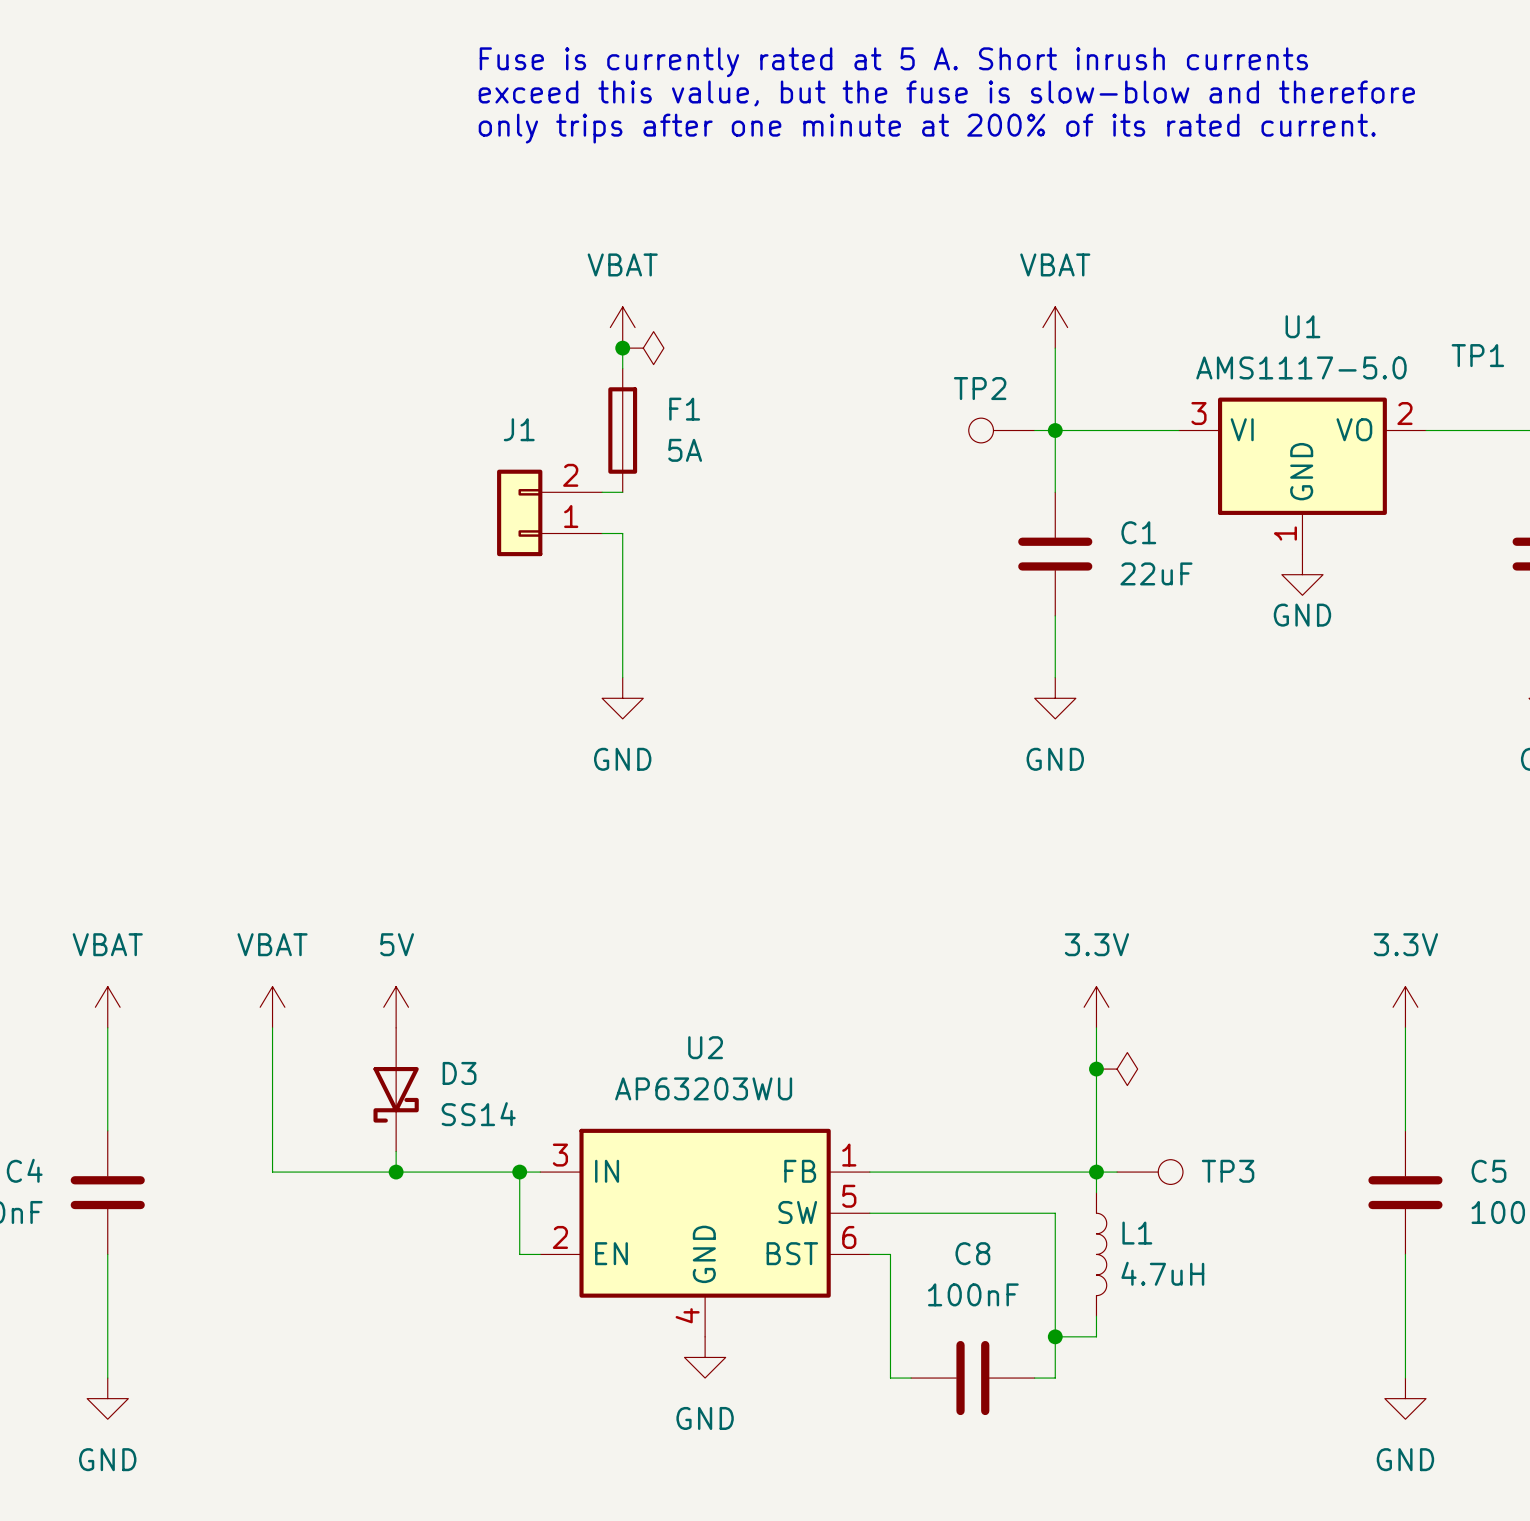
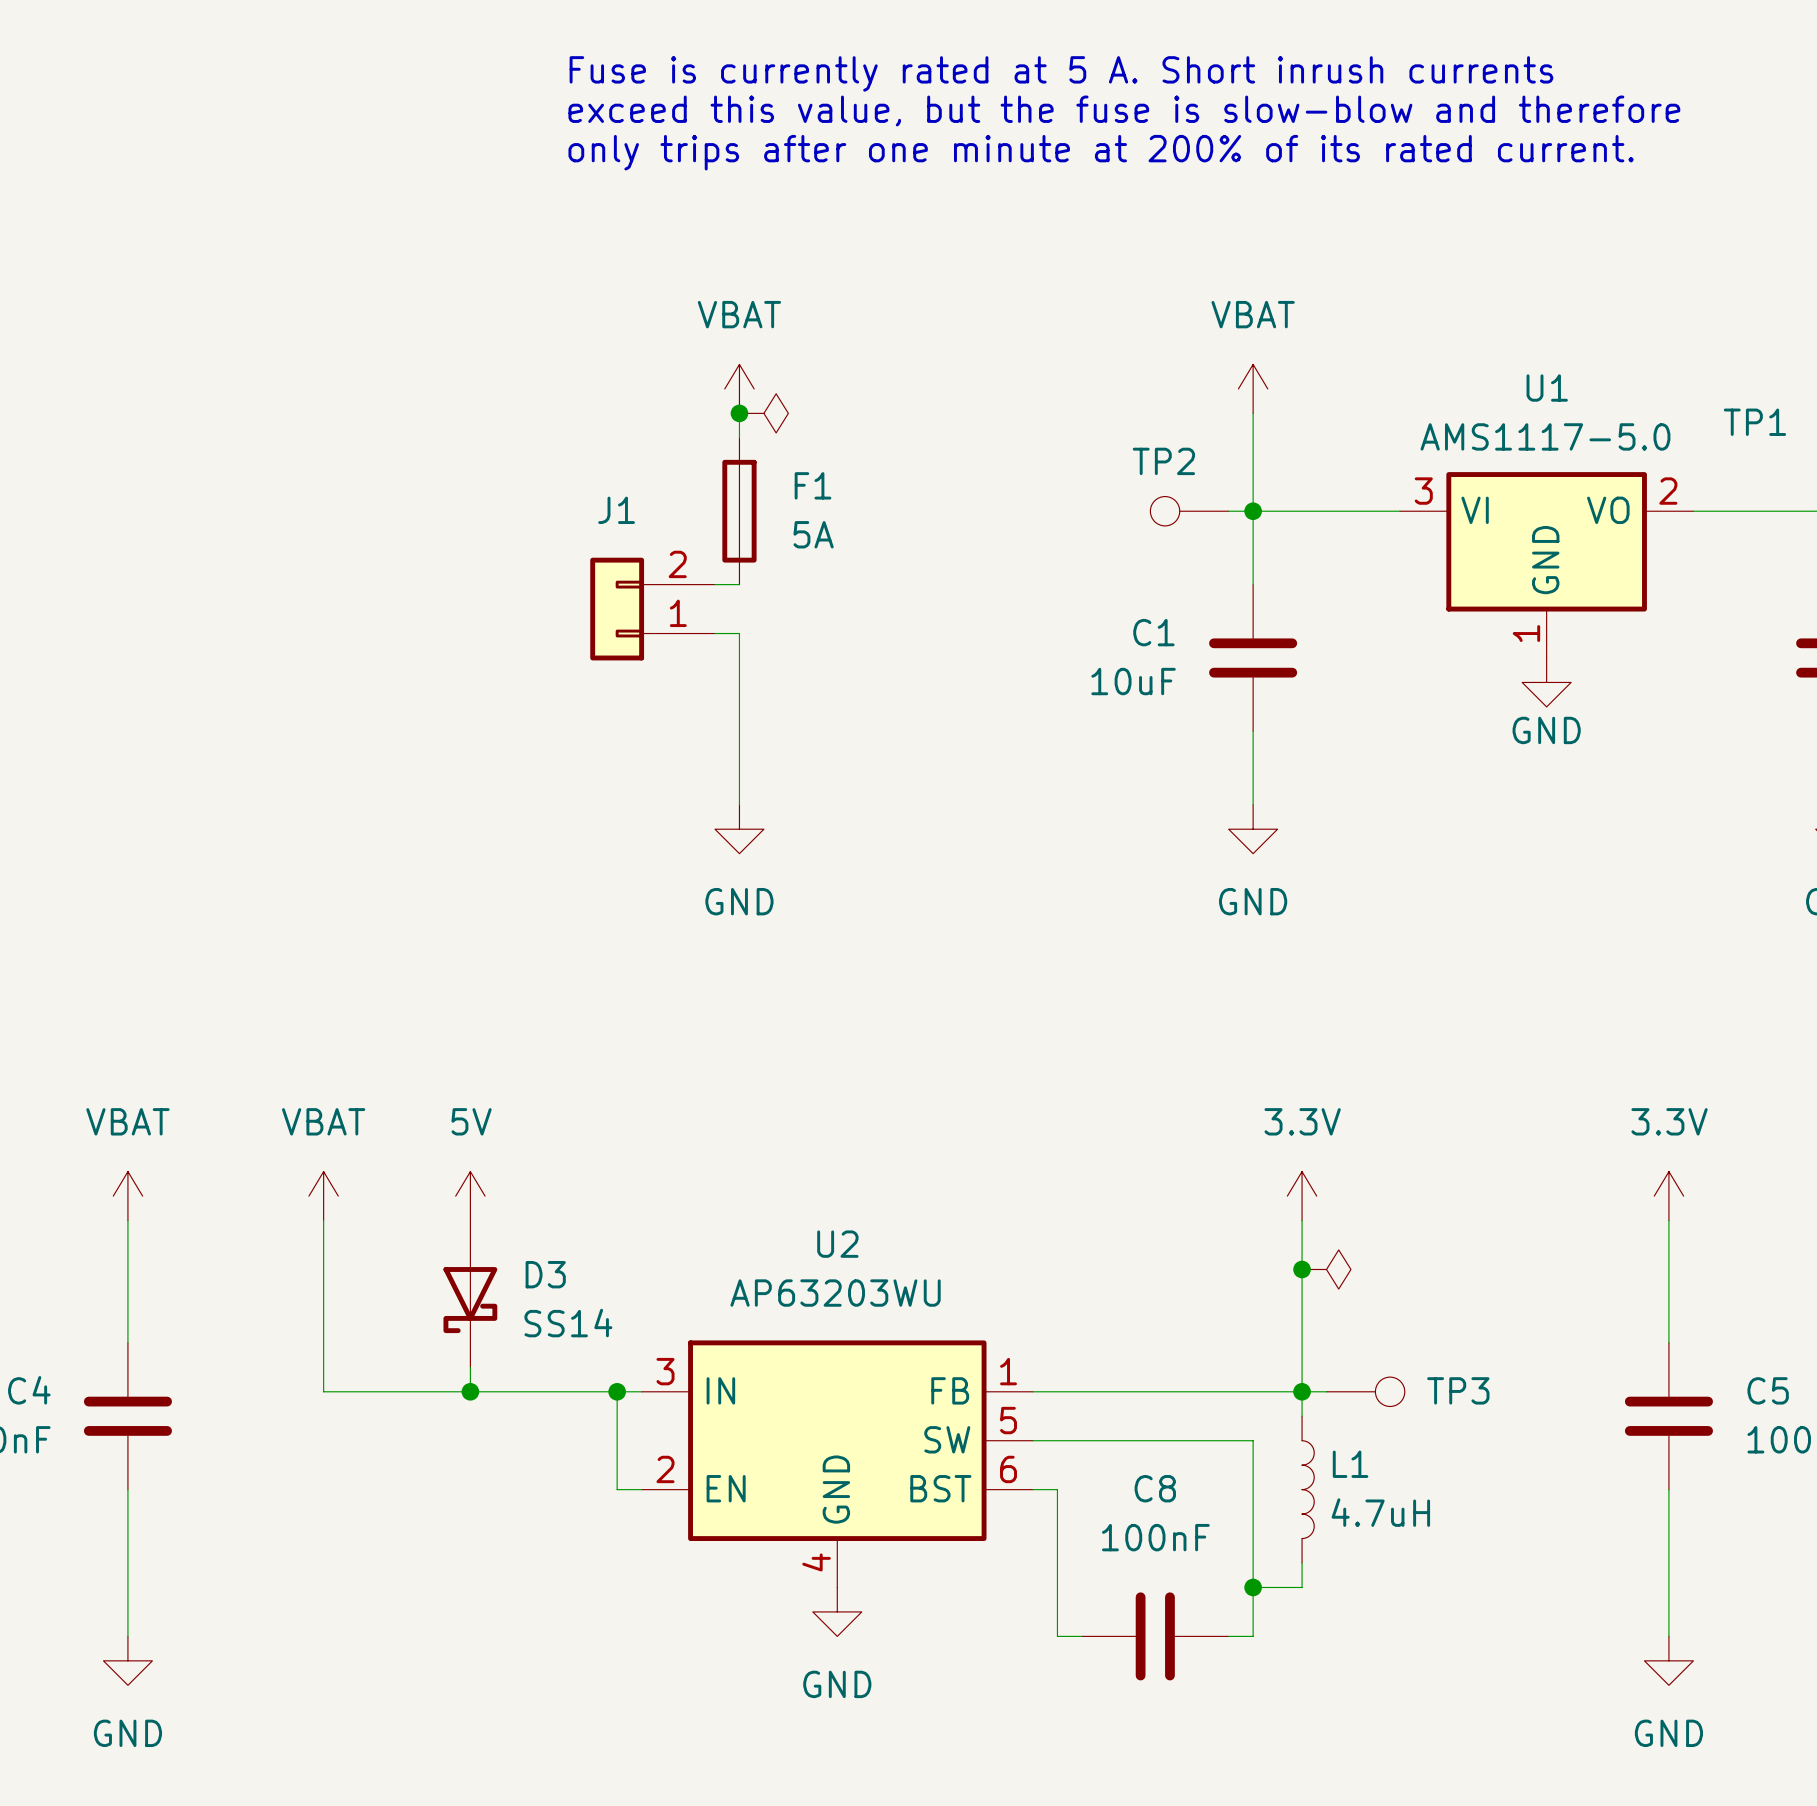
C1 name position: C1 (1138, 532) -> C1 (1153, 632)
C1 value: 22uF (1156, 573) -> 10uF (1133, 681)

